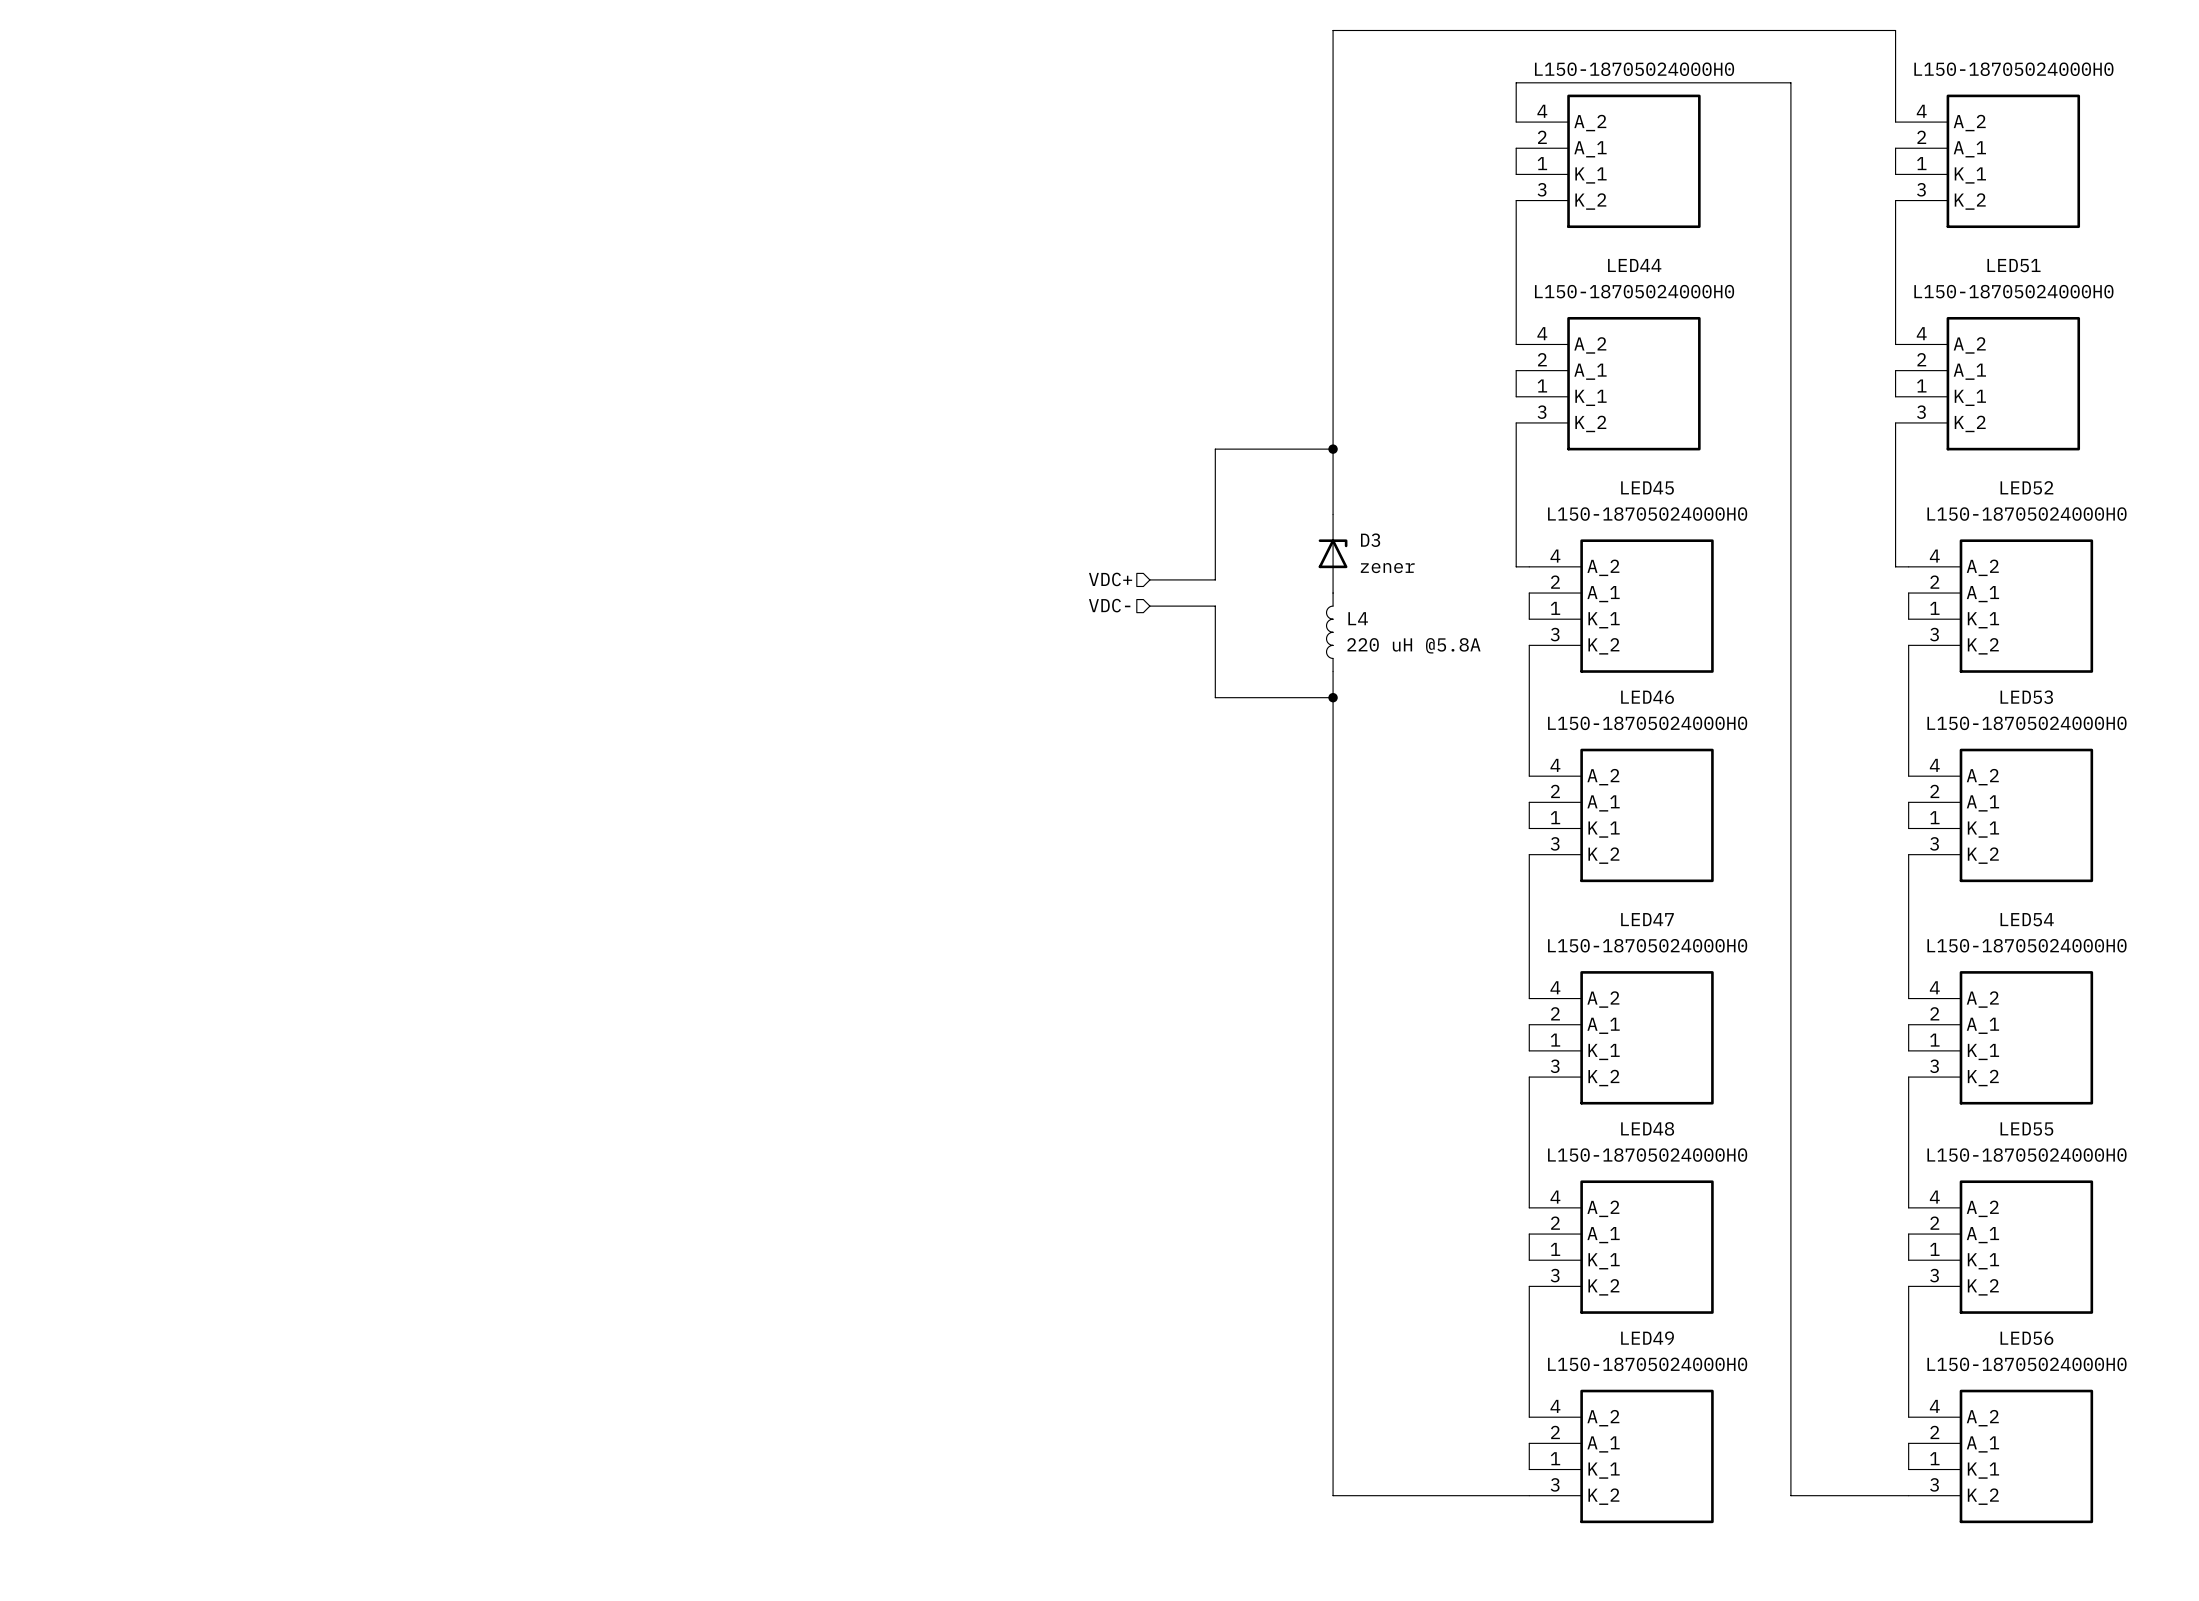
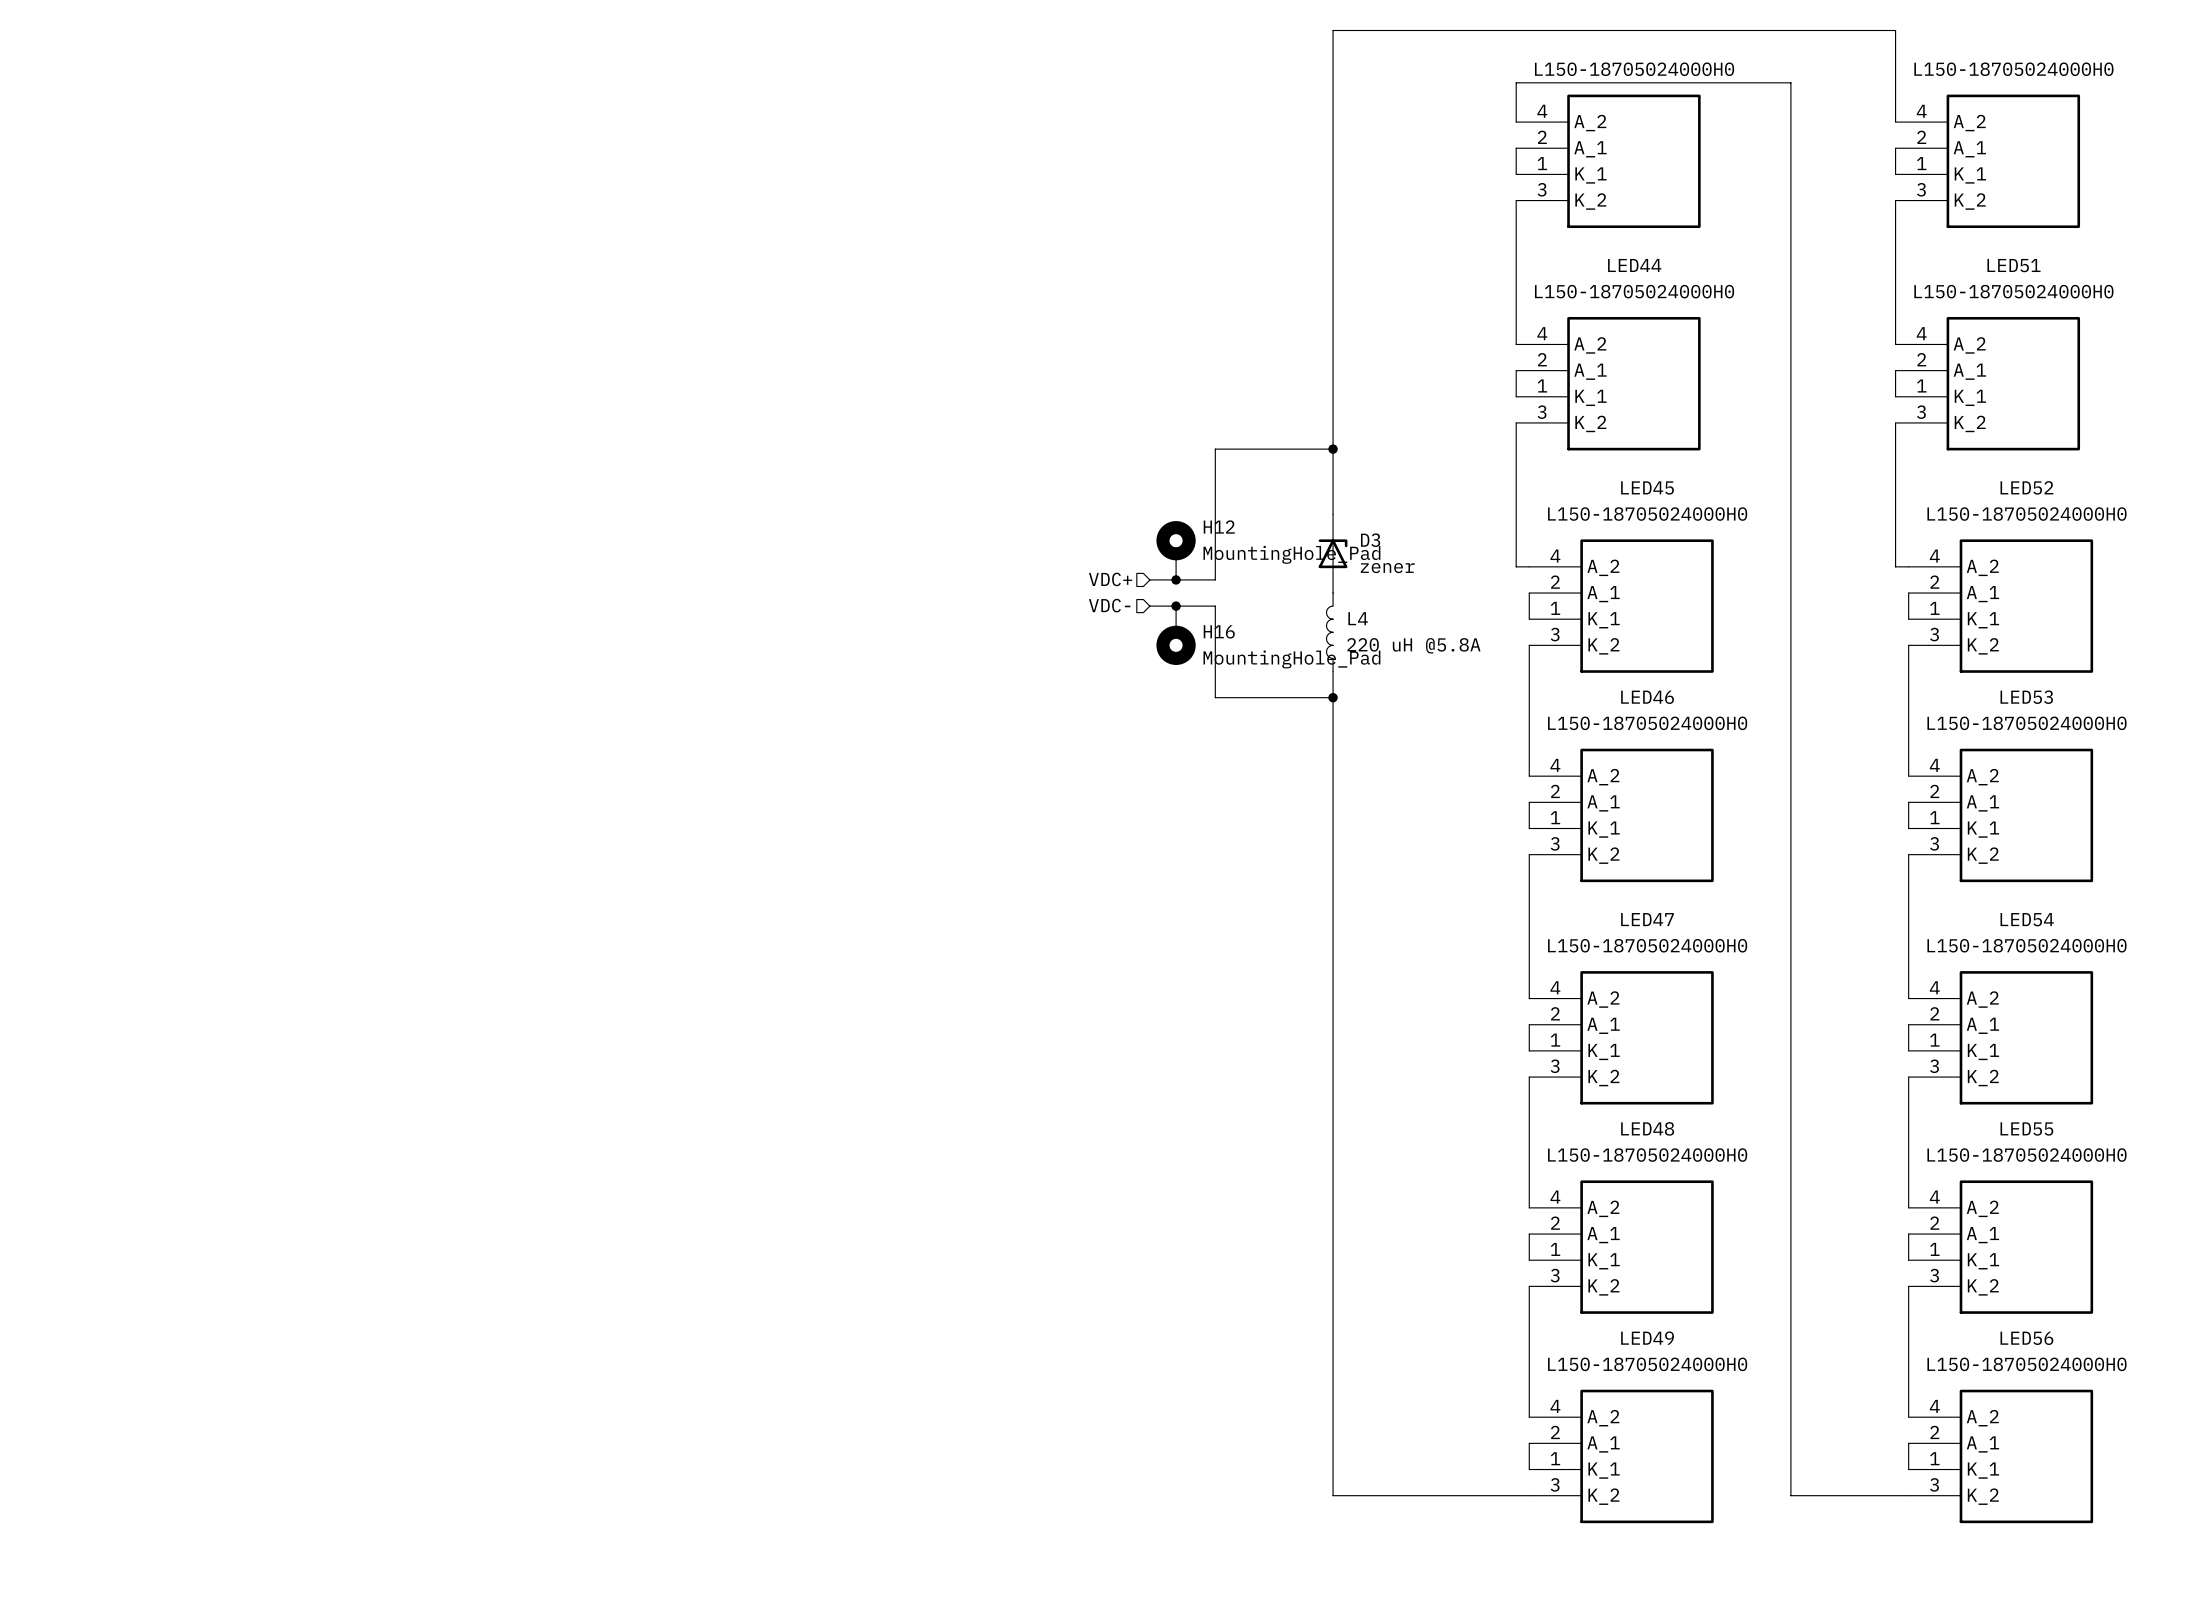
H12: none -> MountingHole_Pad (1176, 550)
junction: none -> (1176, 579)
junction: none -> (1176, 606)
H16: none -> MountingHole_Pad (1176, 635)

